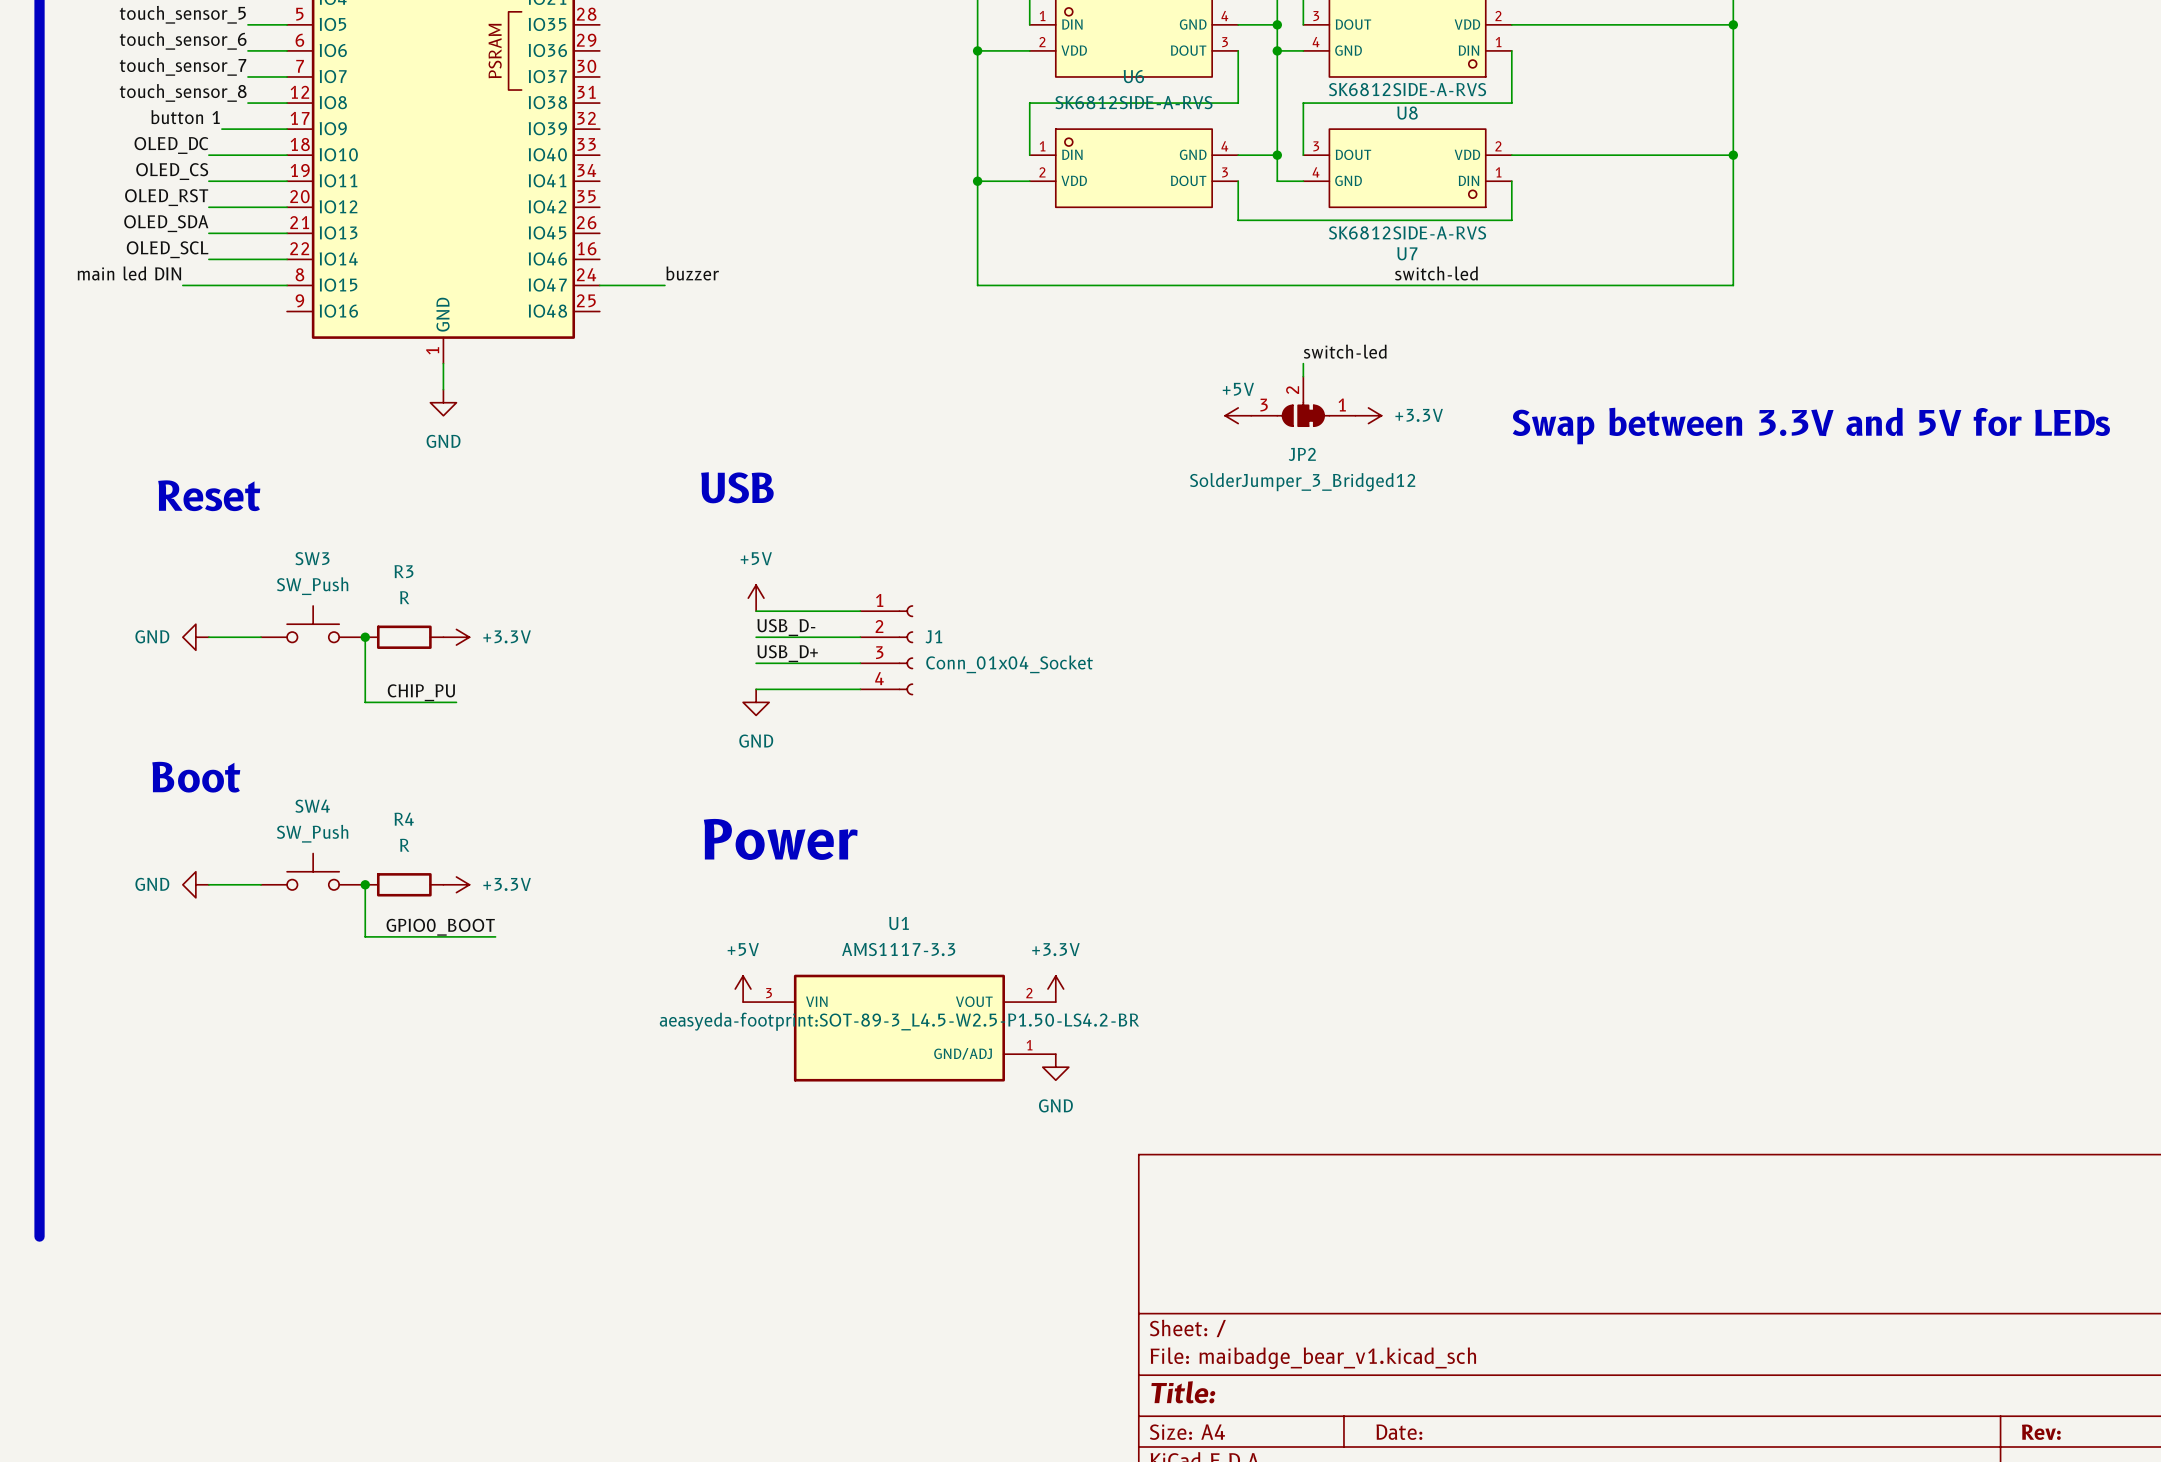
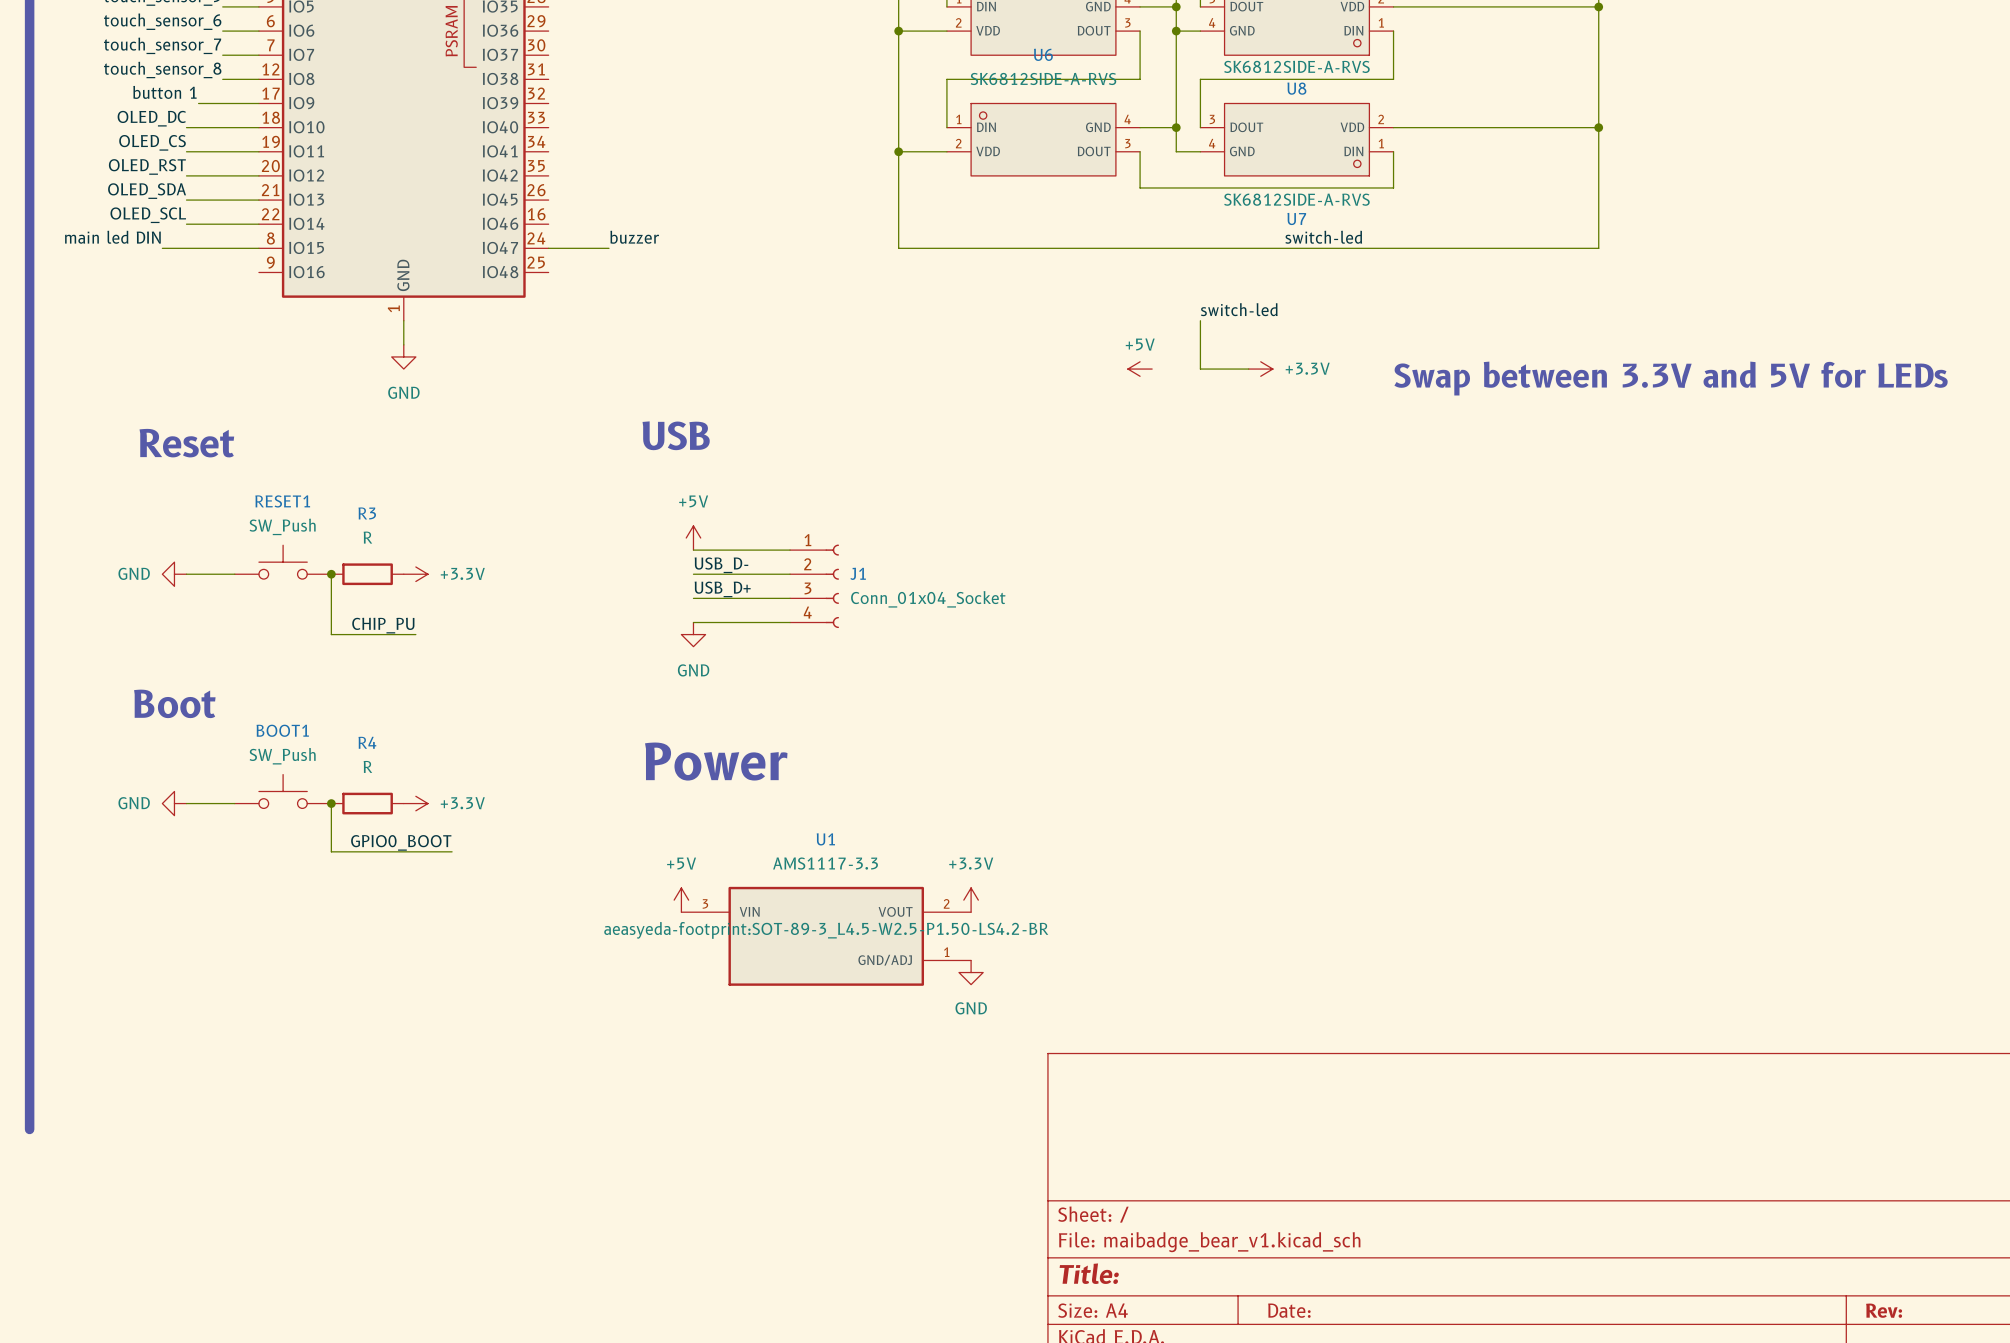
JP2: SolderJumper_3_Bridged12 (1303, 401) -> none
SW3 name: SW3 (312, 558) -> RESET1 (282, 501)
SW4 name: SW4 (312, 806) -> BOOT1 (282, 730)

